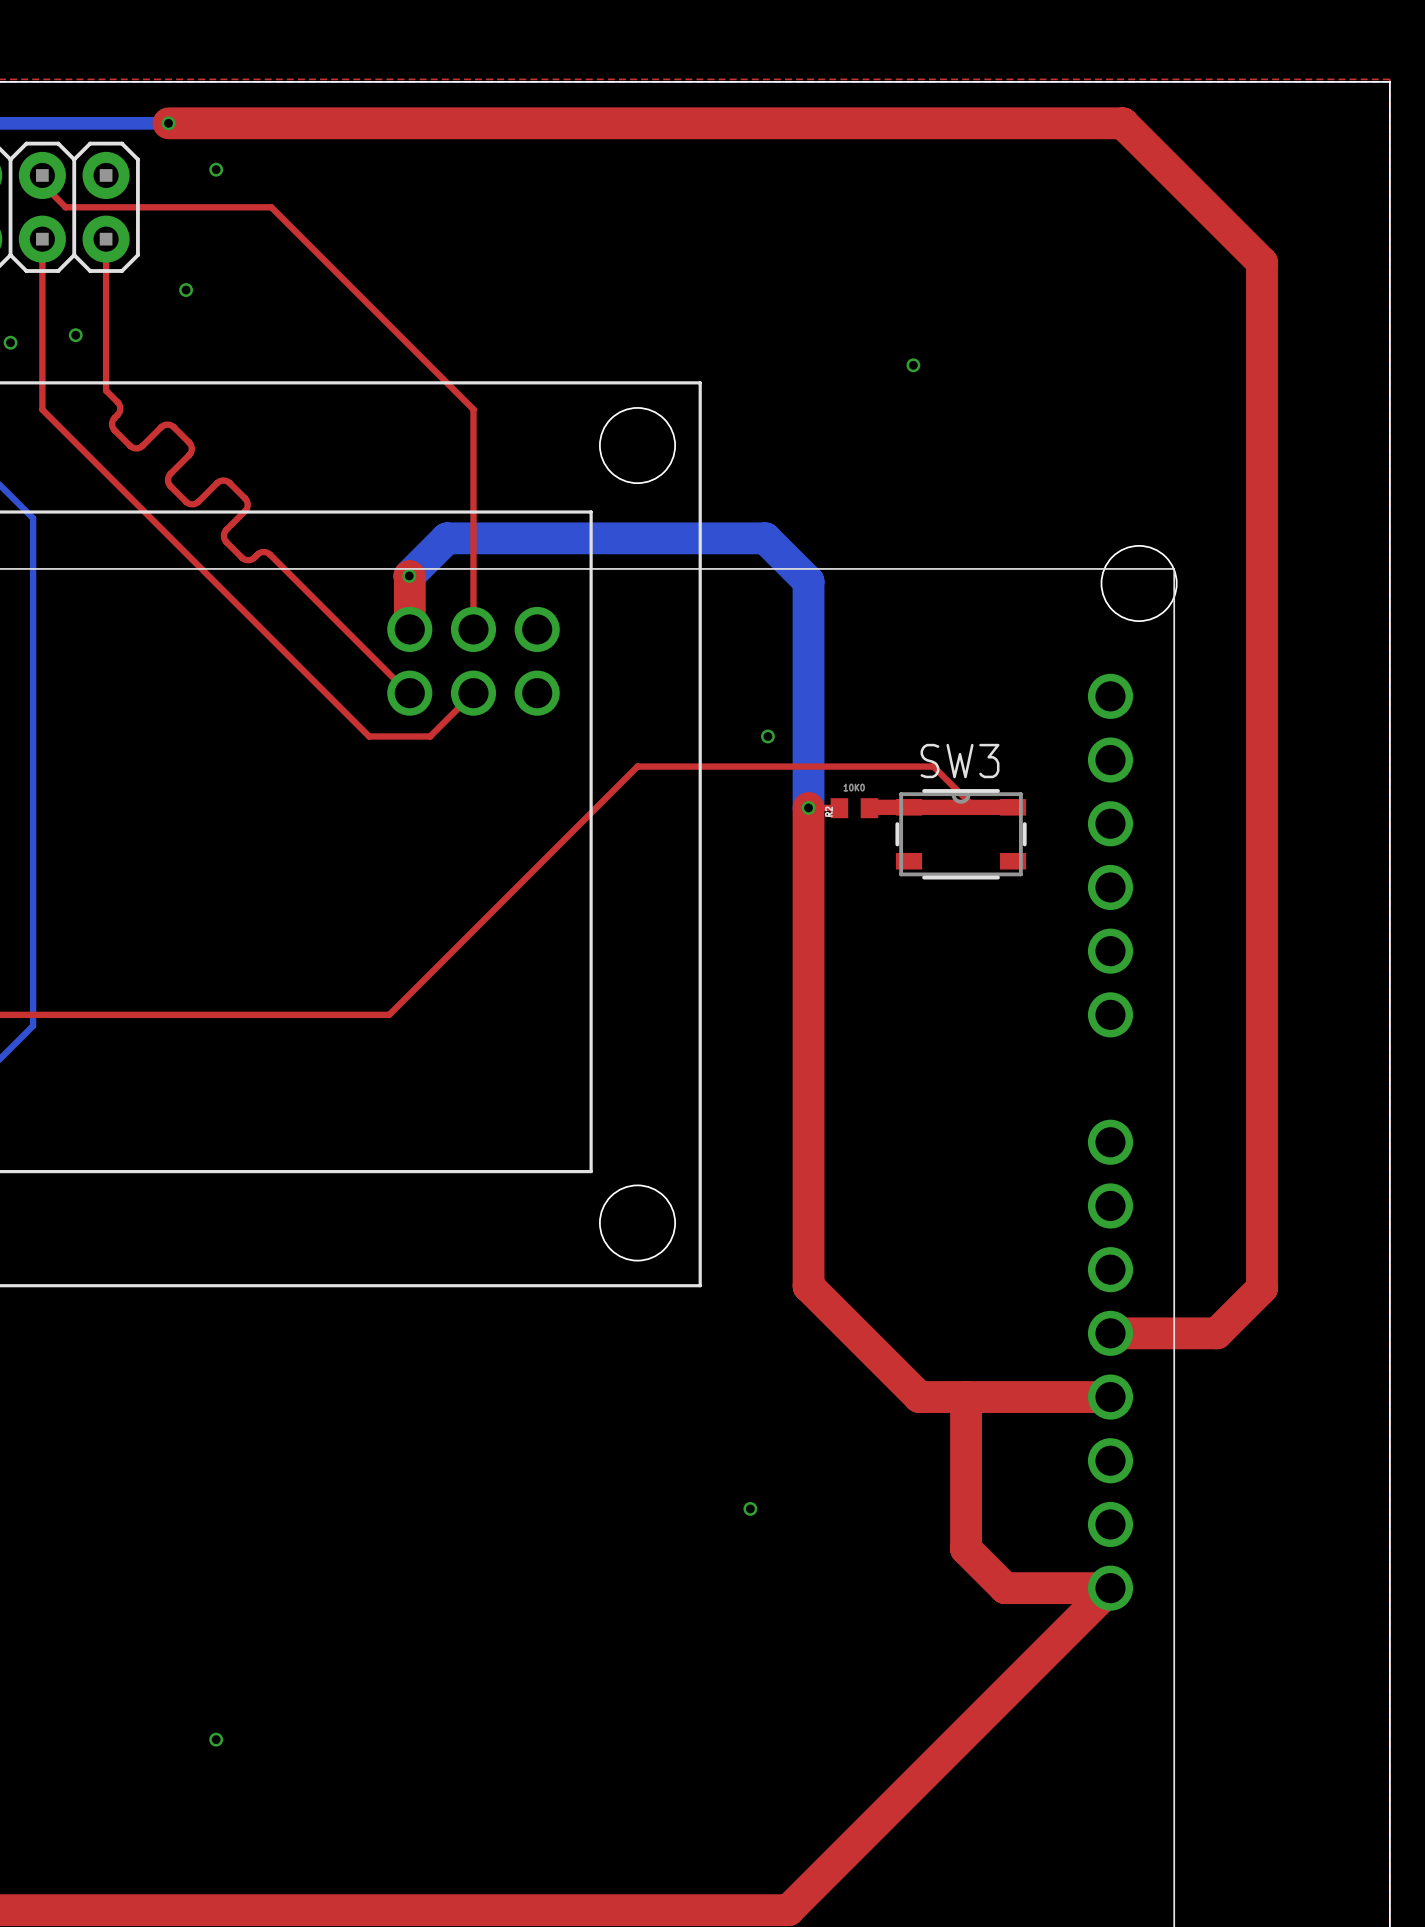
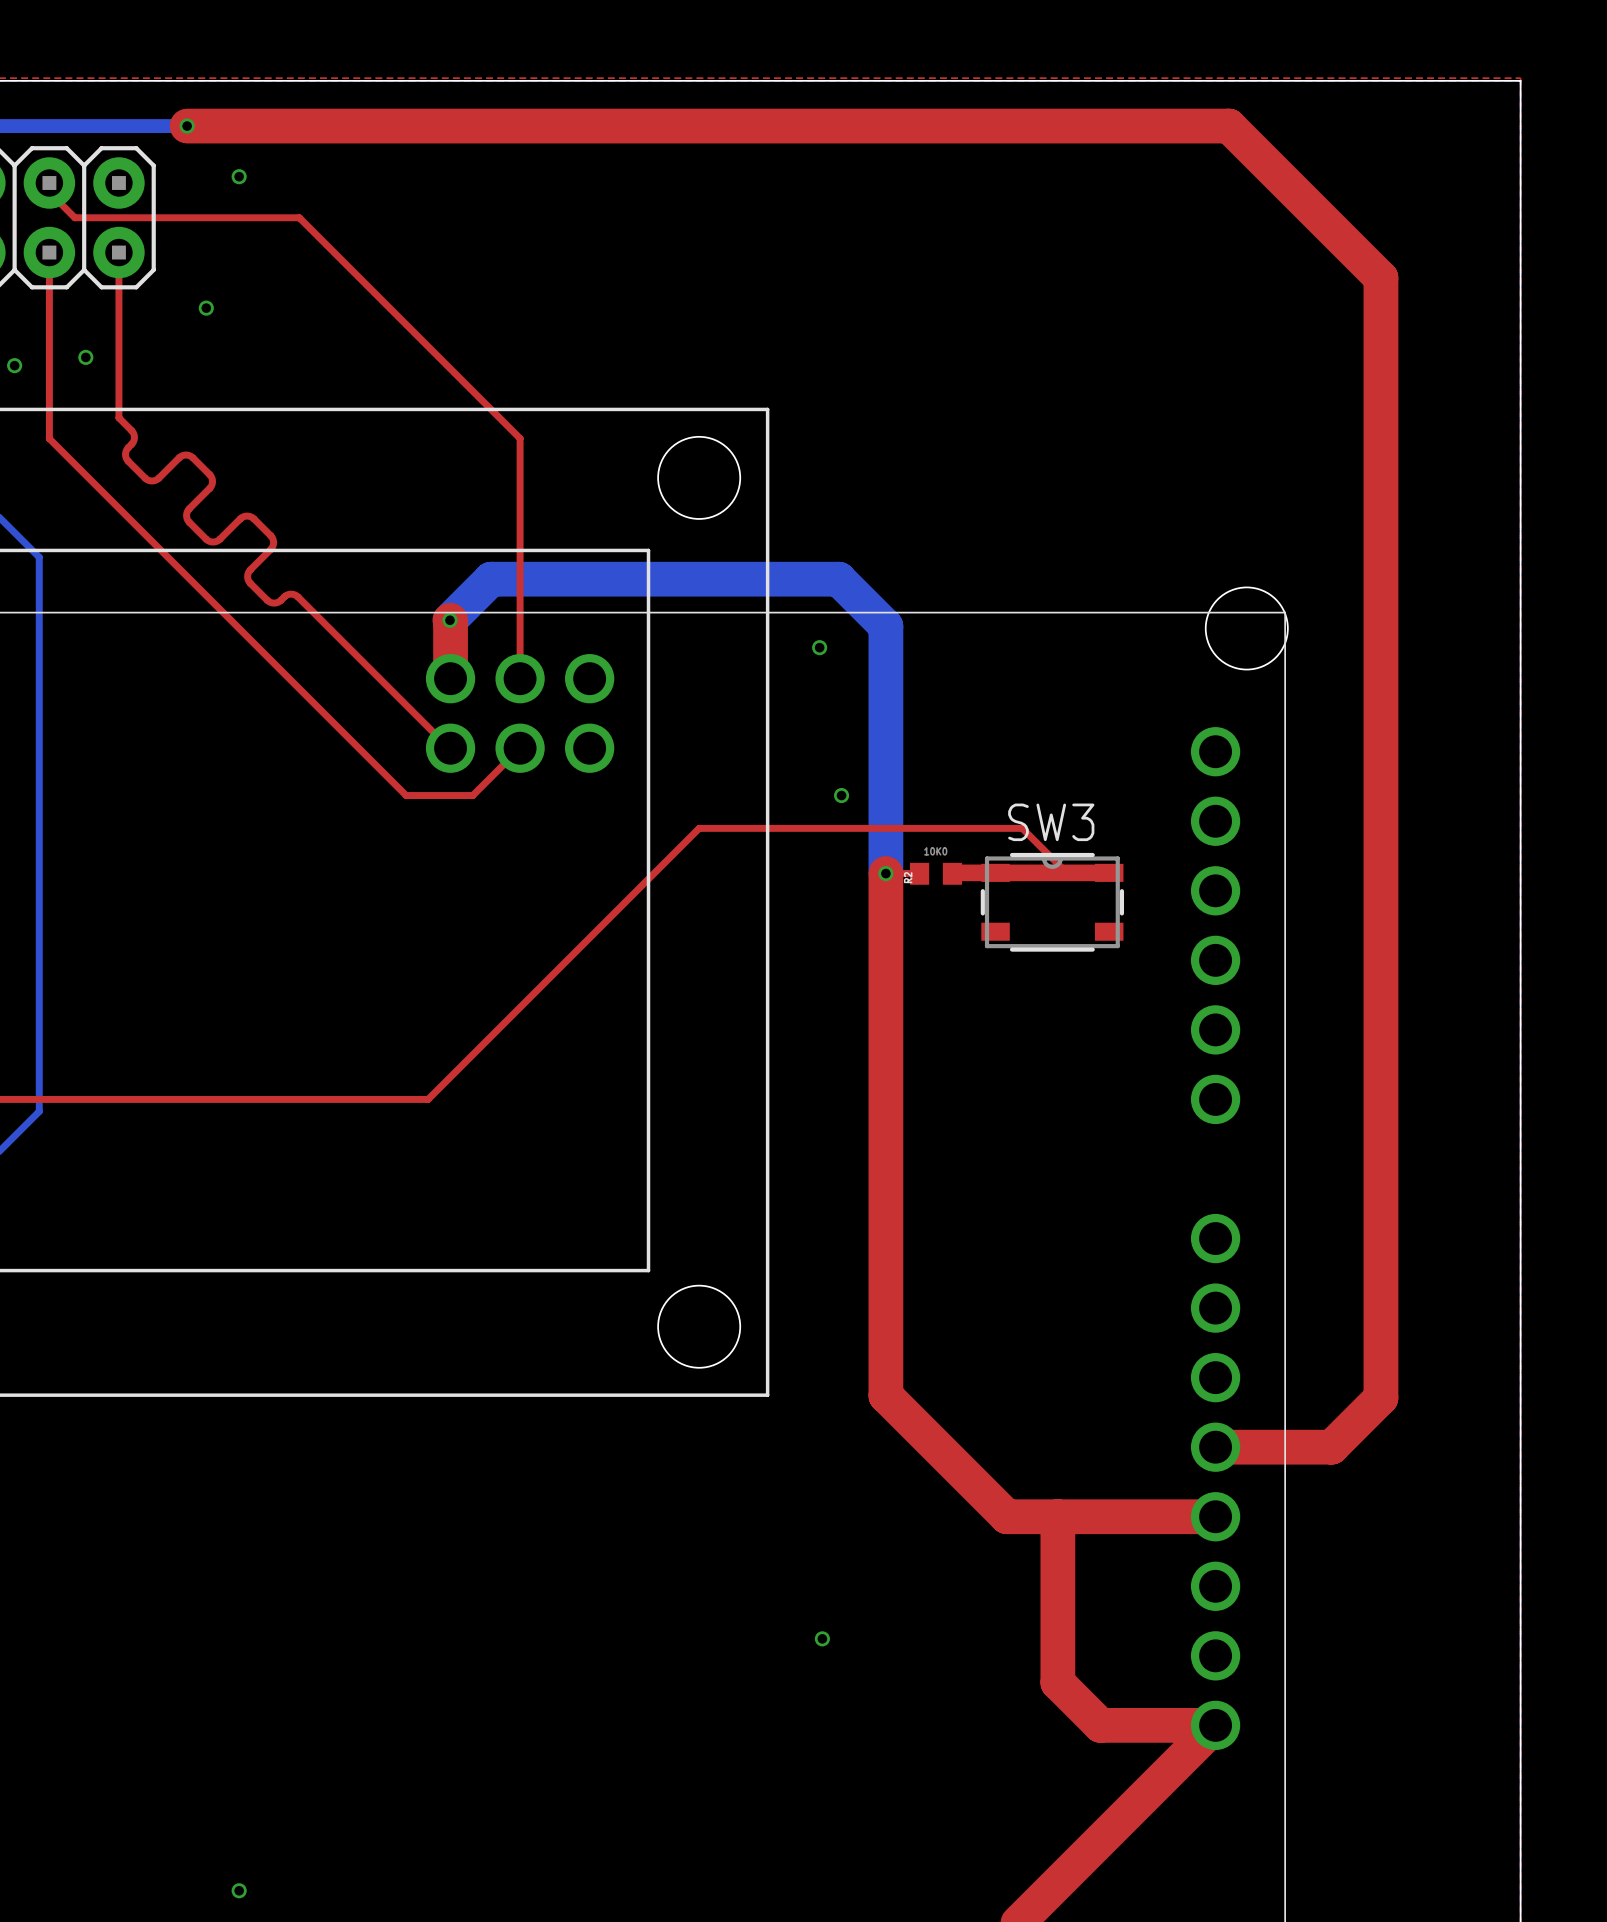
via: (913, 365) -> none
via: none -> (819, 647)

